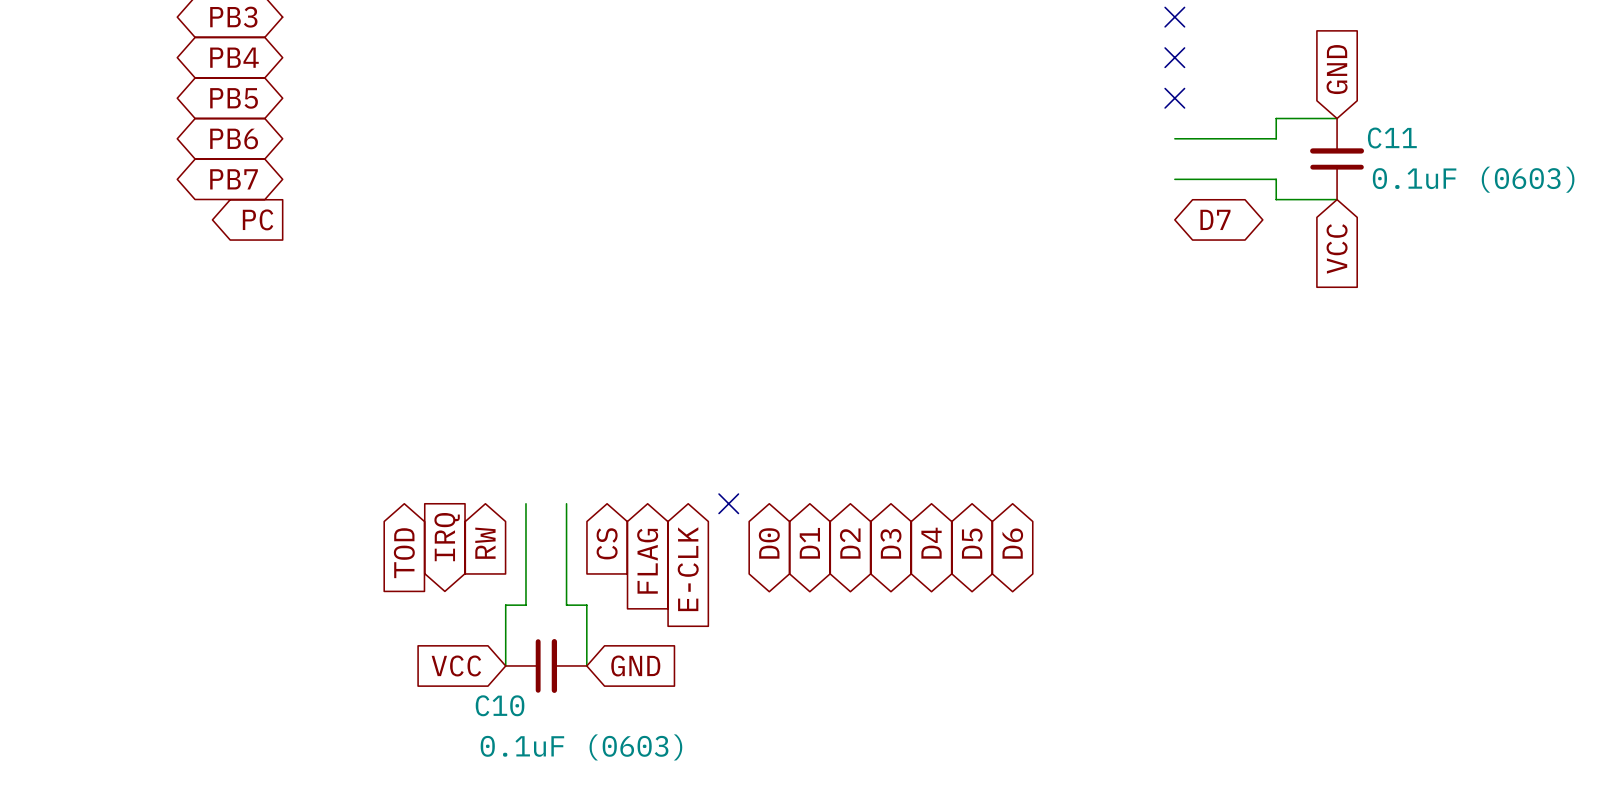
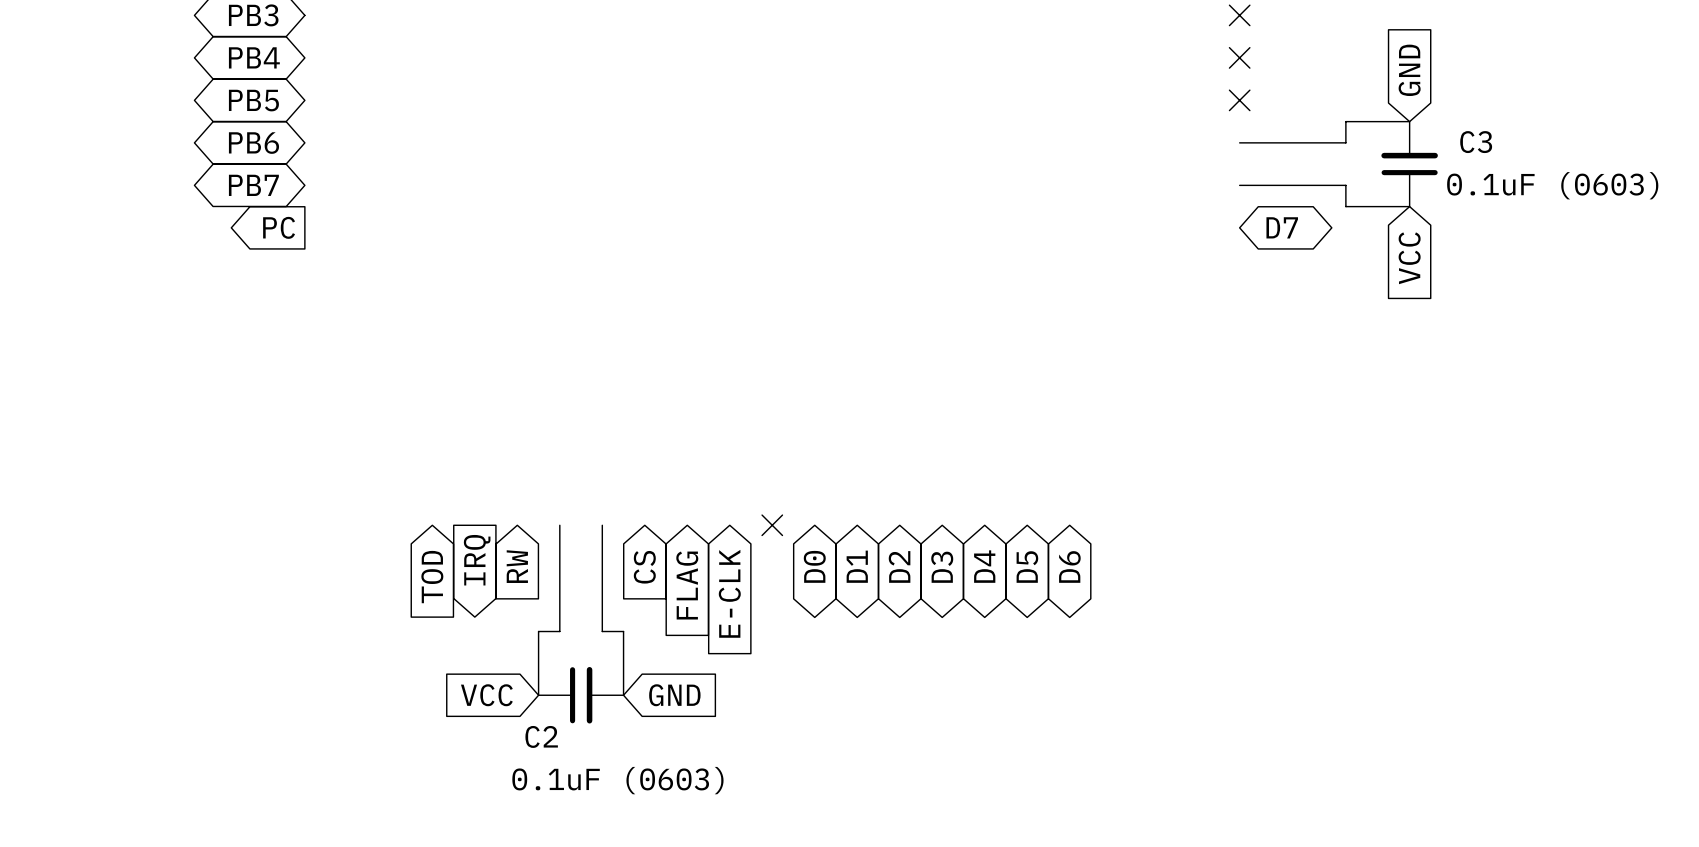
C11 name: C11 (1392, 138) -> C3 (1476, 142)
C10 name: C10 (500, 705) -> C2 (541, 736)

